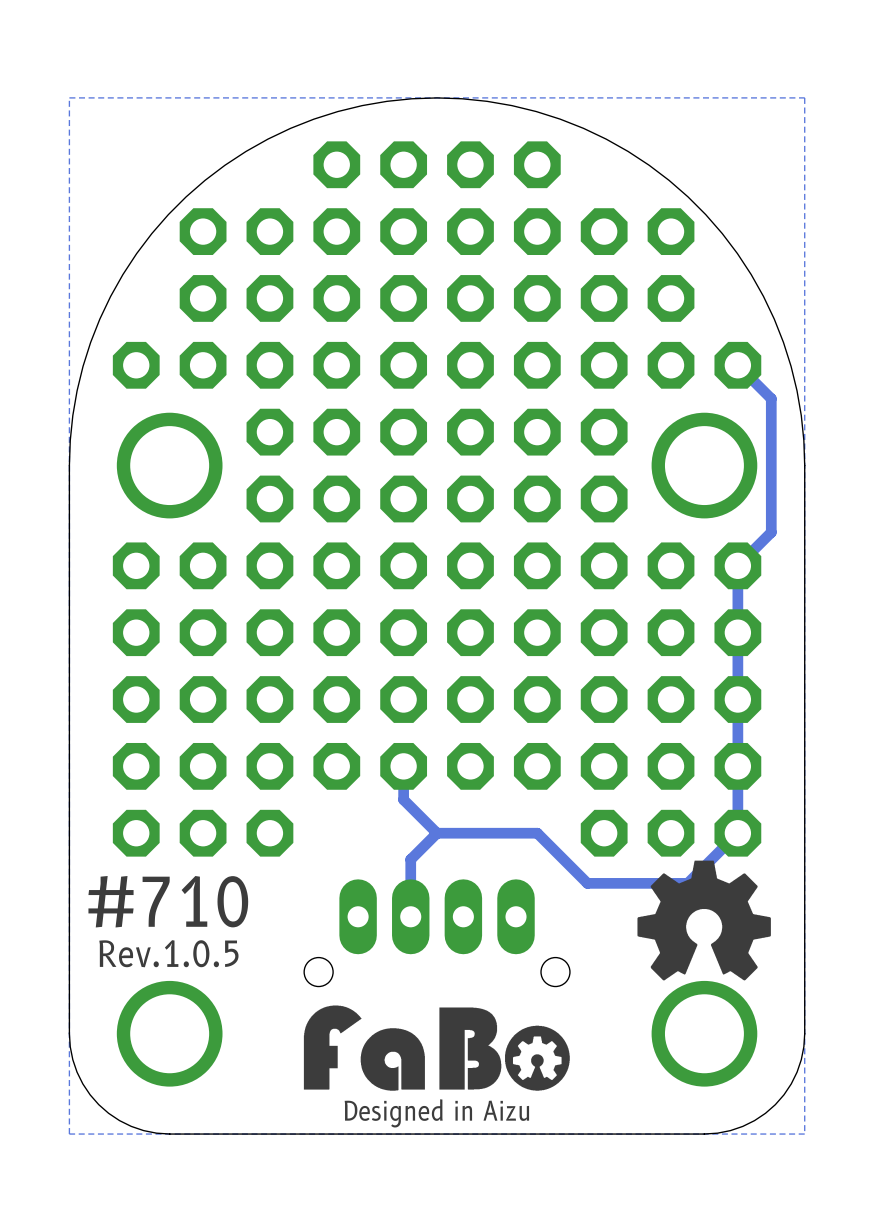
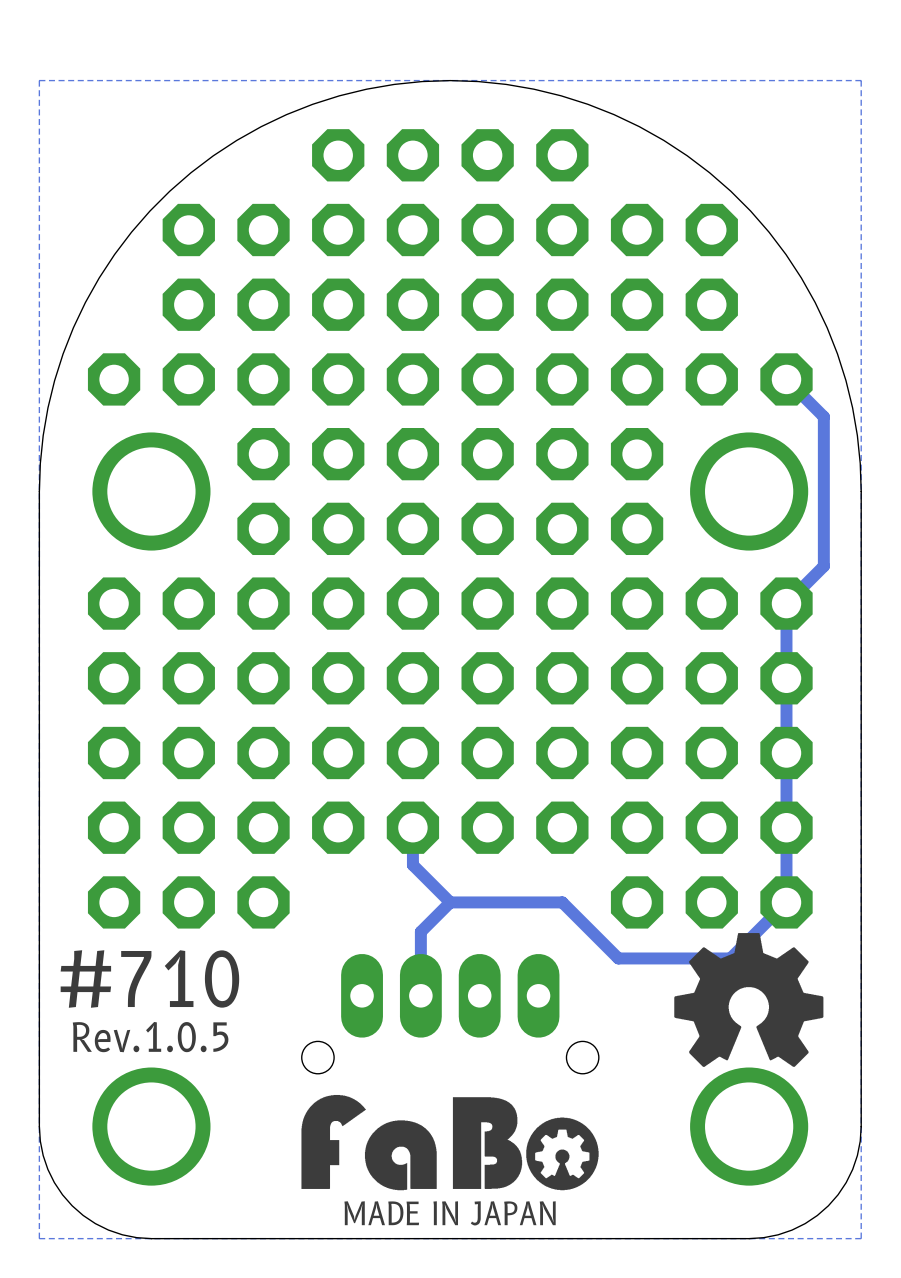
text: Designed in Aizu (436, 1113) -> MADE IN JAPAN (450, 1213)

